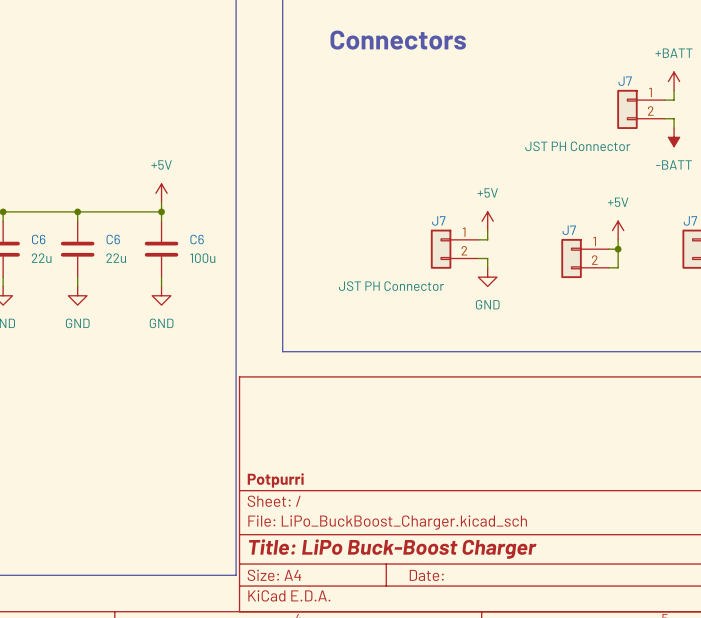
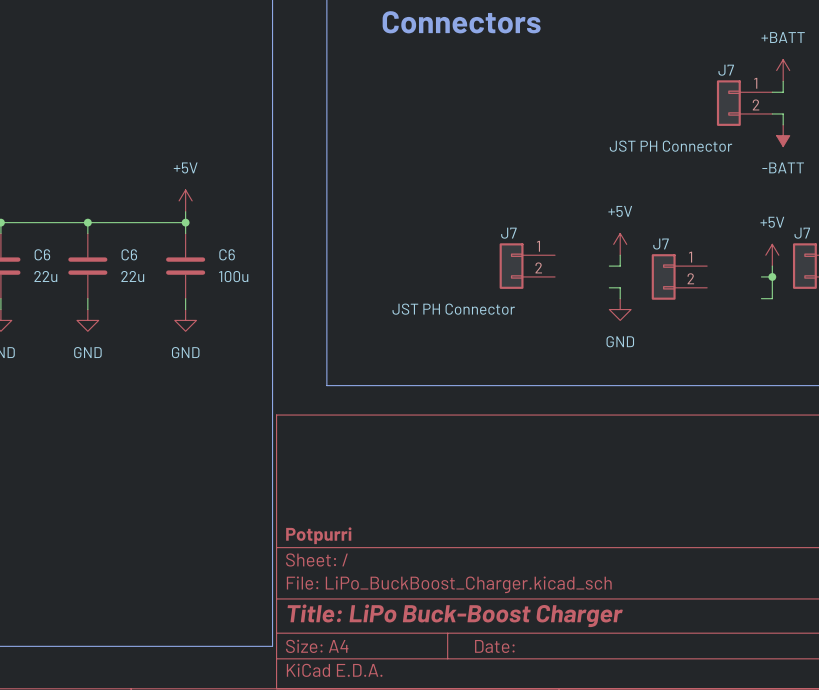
power symbol: +5V (487, 221) -> none
wire: (487, 230) (487, 239) (478, 239) -> (620, 255) (620, 266) (609, 266)
power symbol: none -> +5V (620, 244)
power symbol: +5V (618, 230) -> none
wire: (618, 239) (618, 267) (608, 267) -> (772, 266) (772, 298) (761, 298)
power symbol: none -> +5V (772, 255)
wire: (608, 249) (618, 249) -> (761, 276) (772, 276)
junction: (618, 249) -> none
wire: (478, 258) (487, 258) (487, 267) -> (609, 287) (620, 287) (620, 298)
junction: none -> (772, 276)
power symbol position: GND (487, 277) -> GND (620, 309)

